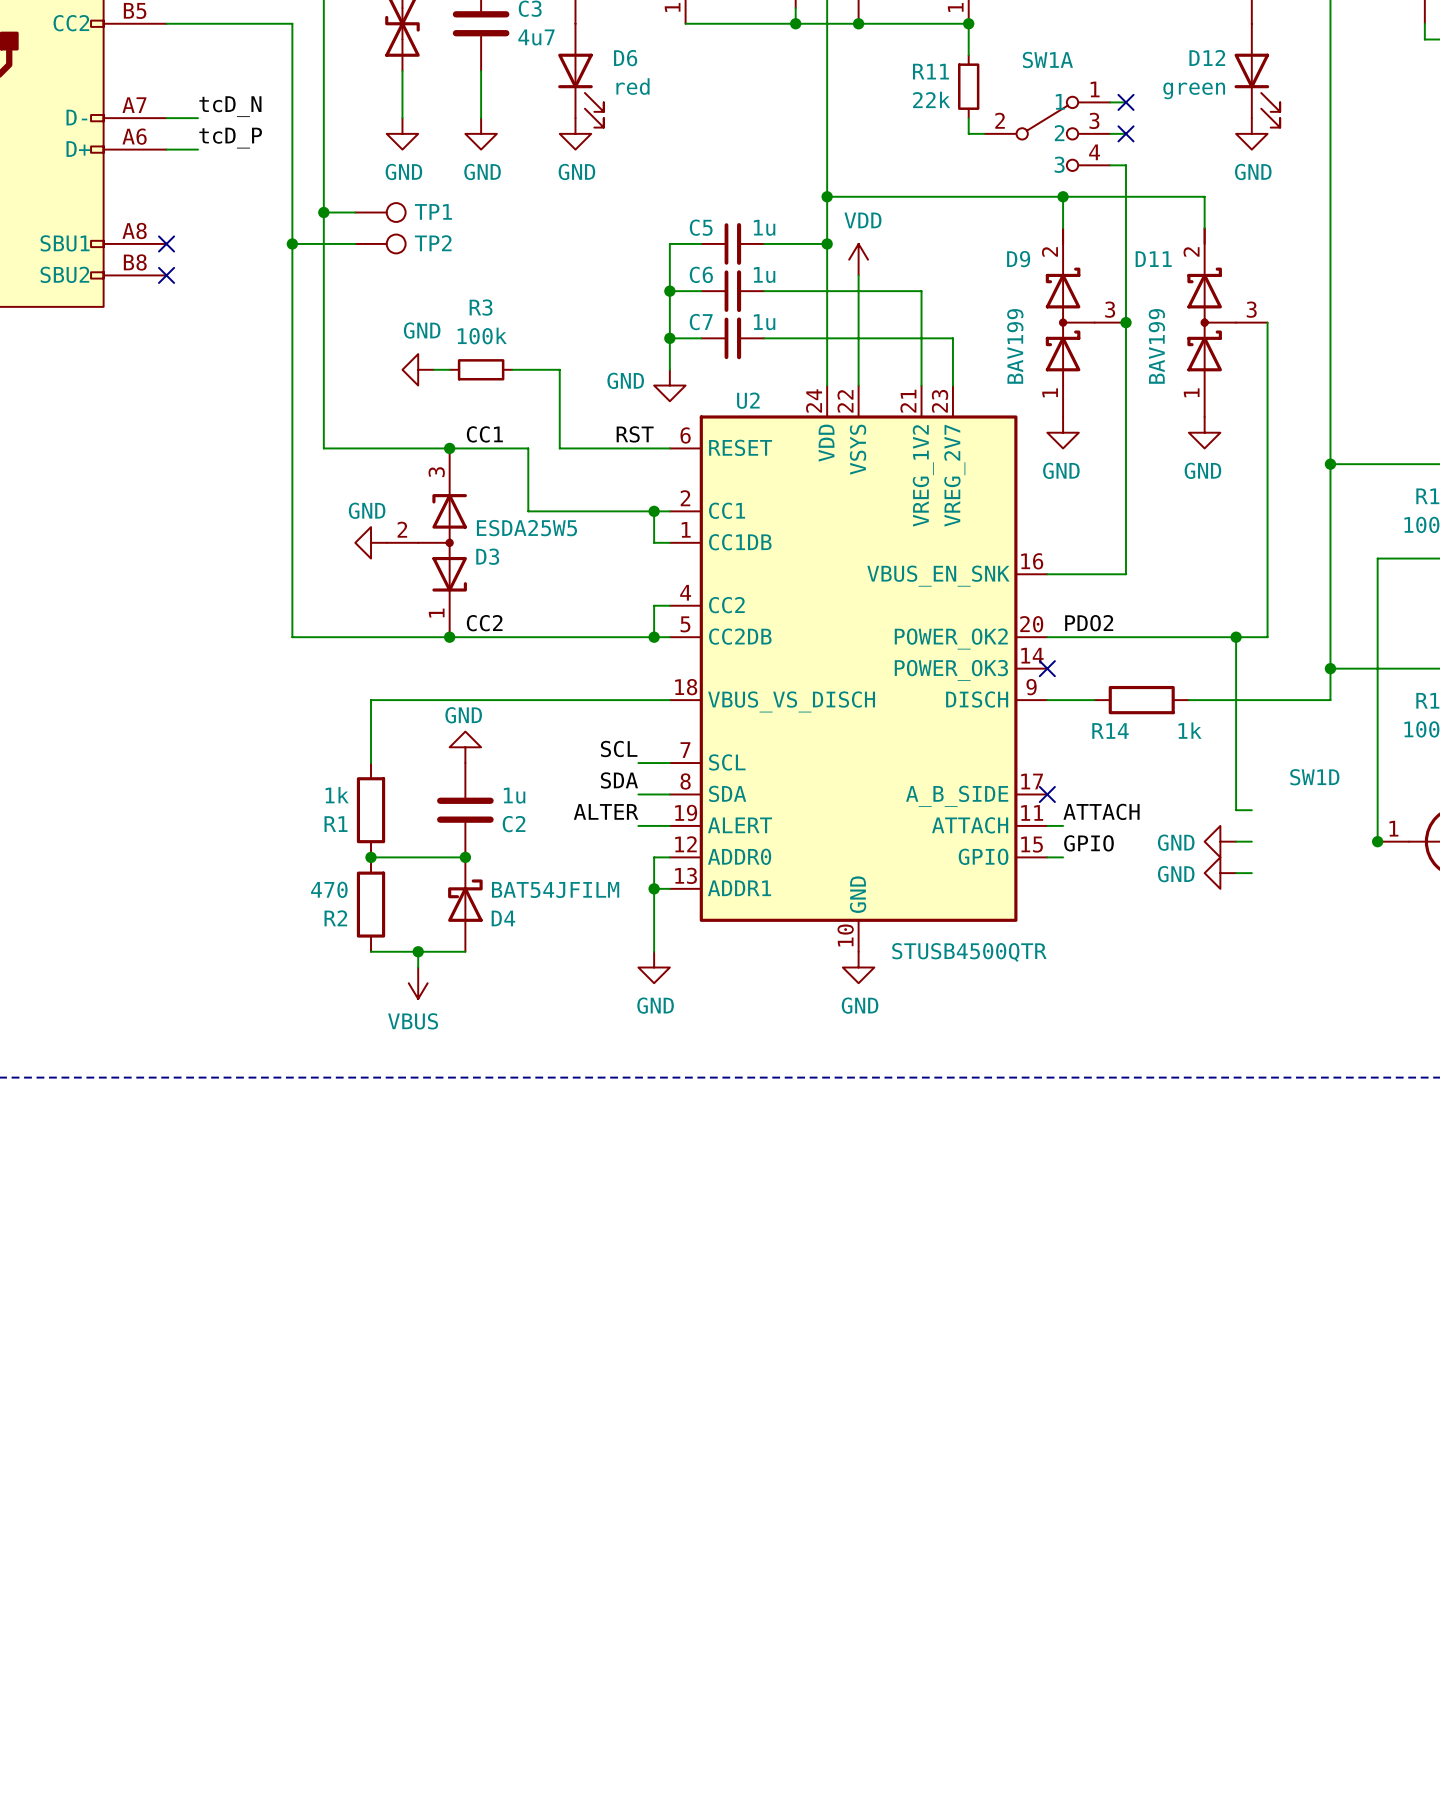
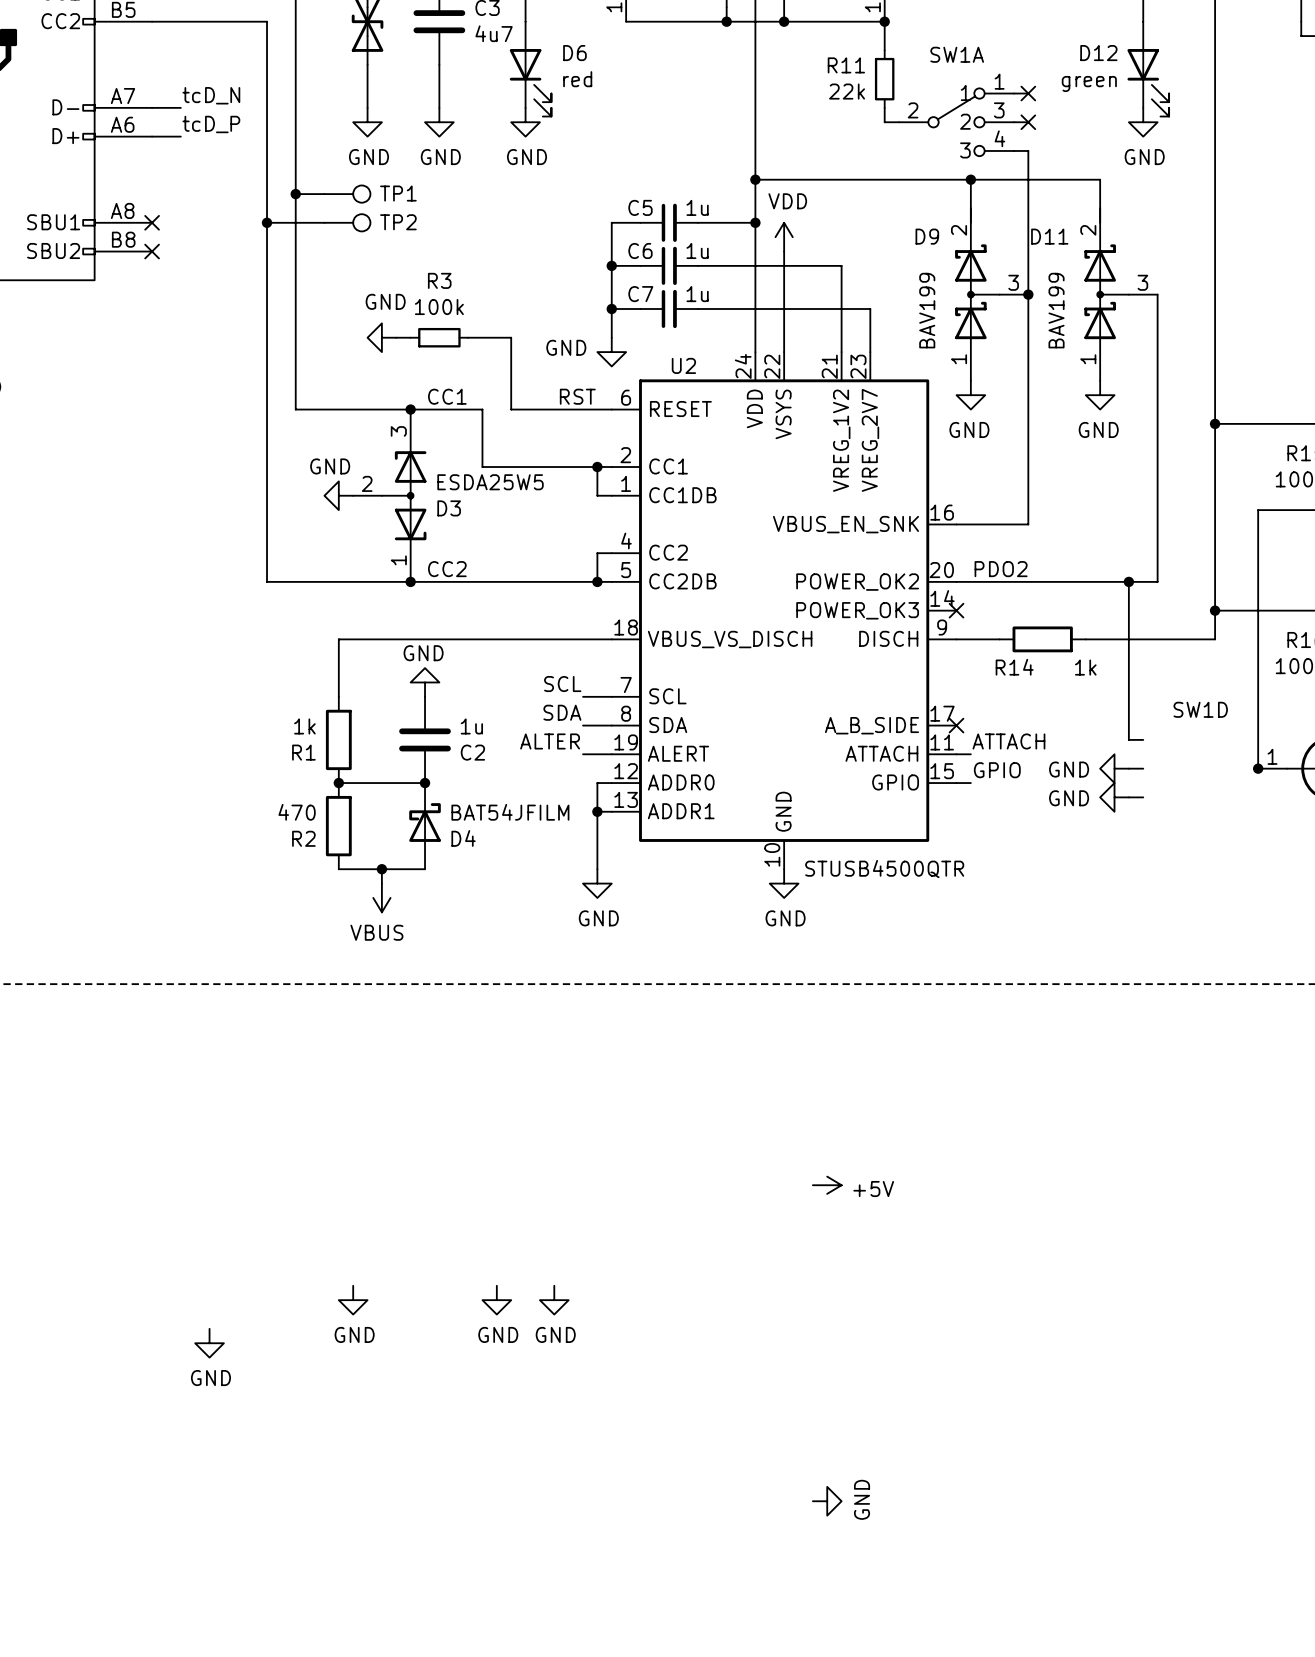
power symbol: none -> +5V (827, 1185)
power symbol: none -> GND (353, 1300)
power symbol: none -> GND (496, 1300)
power symbol: none -> GND (554, 1300)
power symbol: none -> GND (209, 1343)
power symbol: none -> GND (827, 1501)

